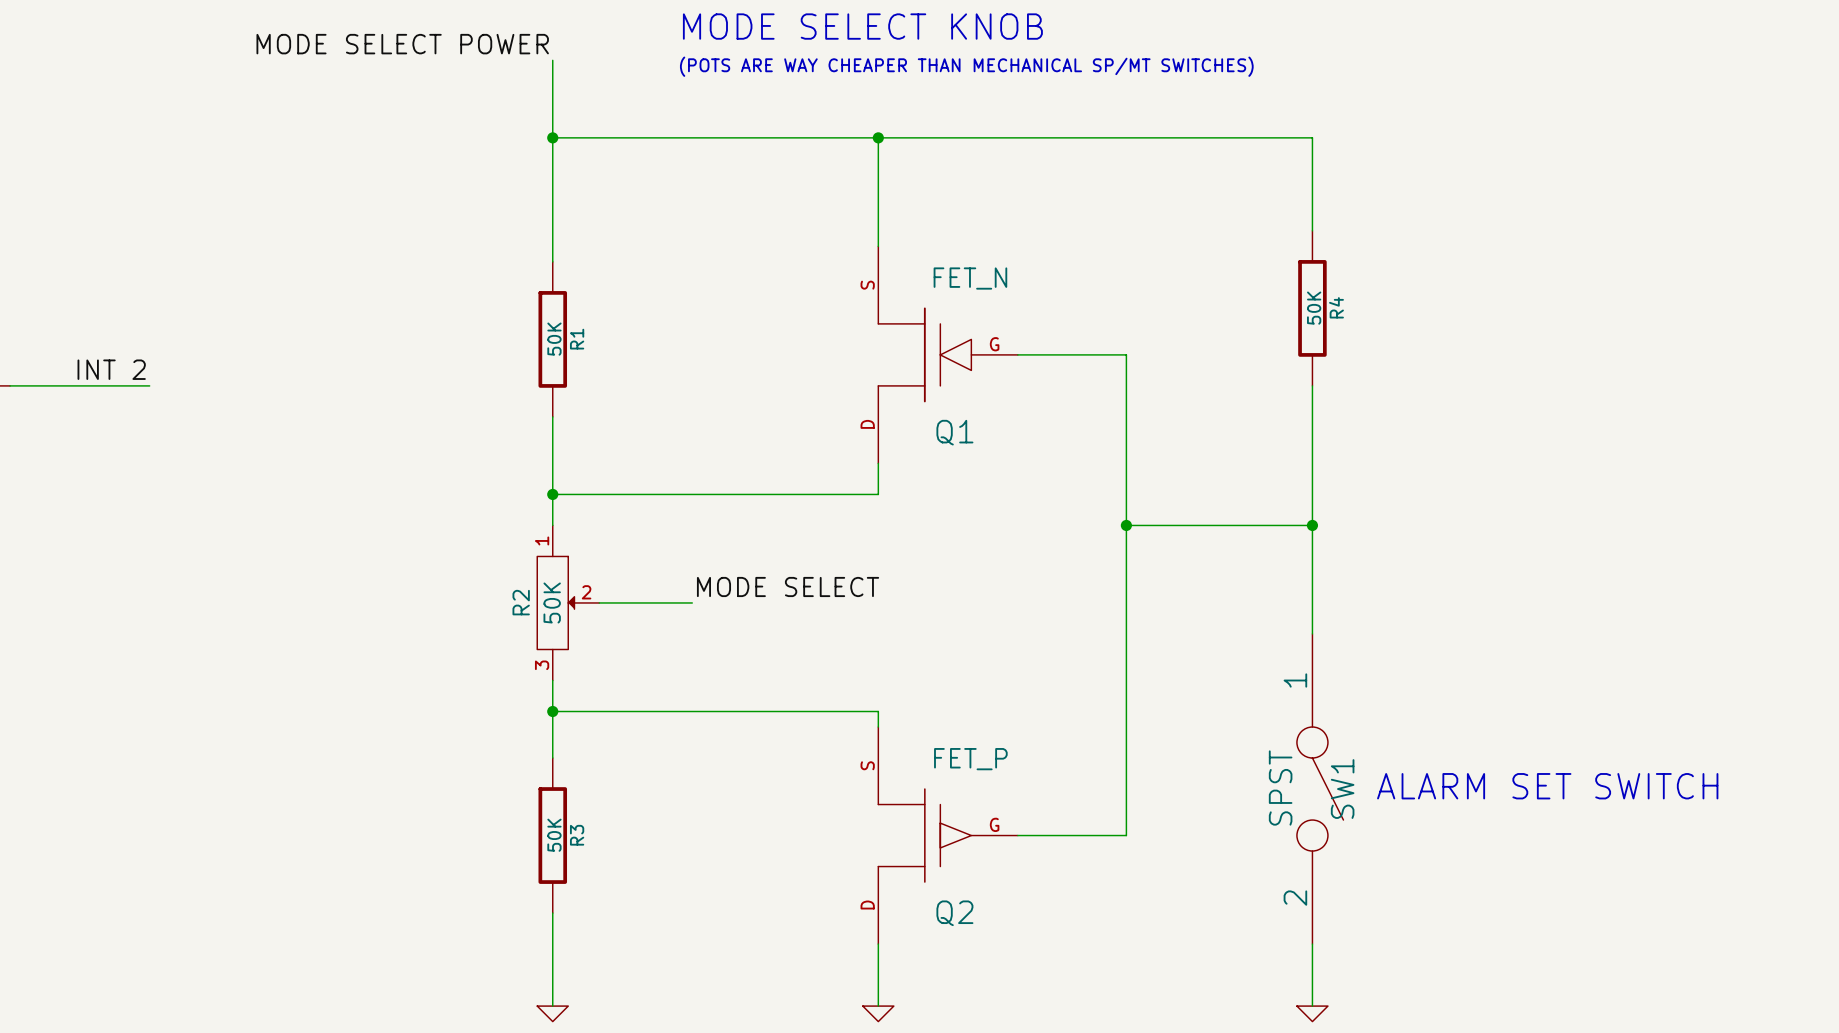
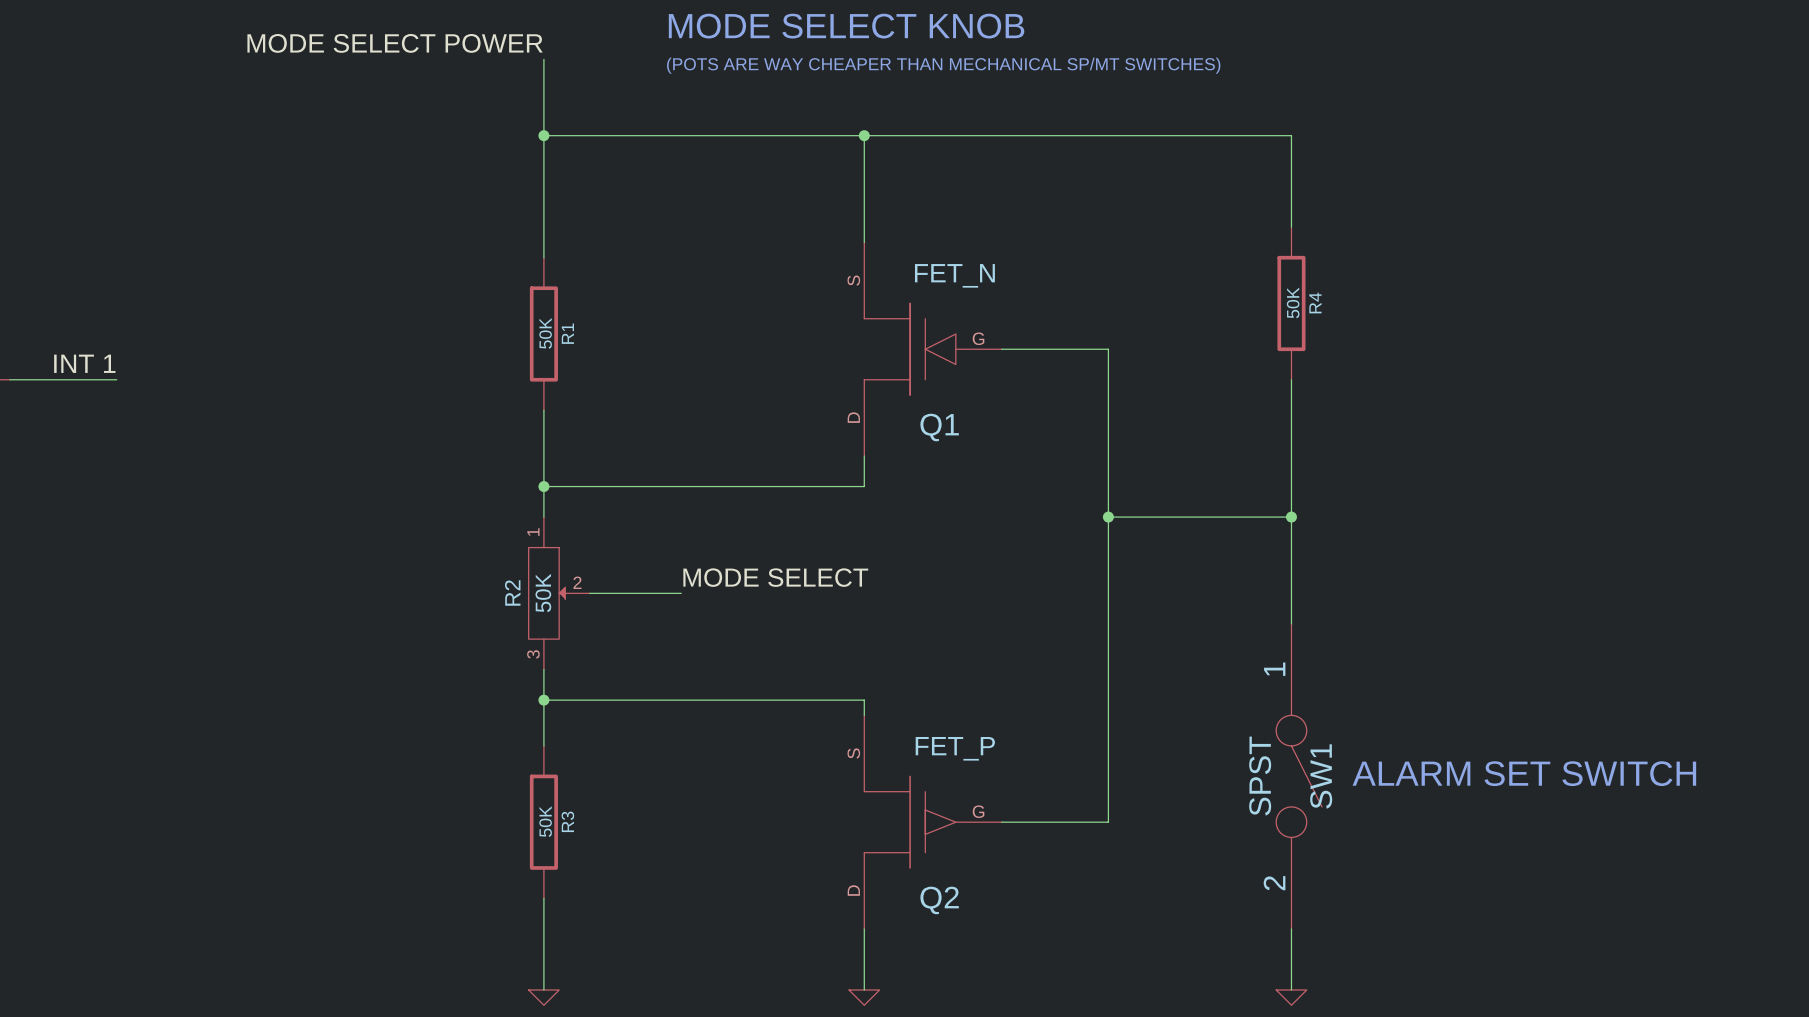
label: INT 2 (111, 369) -> INT 1 (84, 363)
wire: (118, 385) (149, 385) -> none

